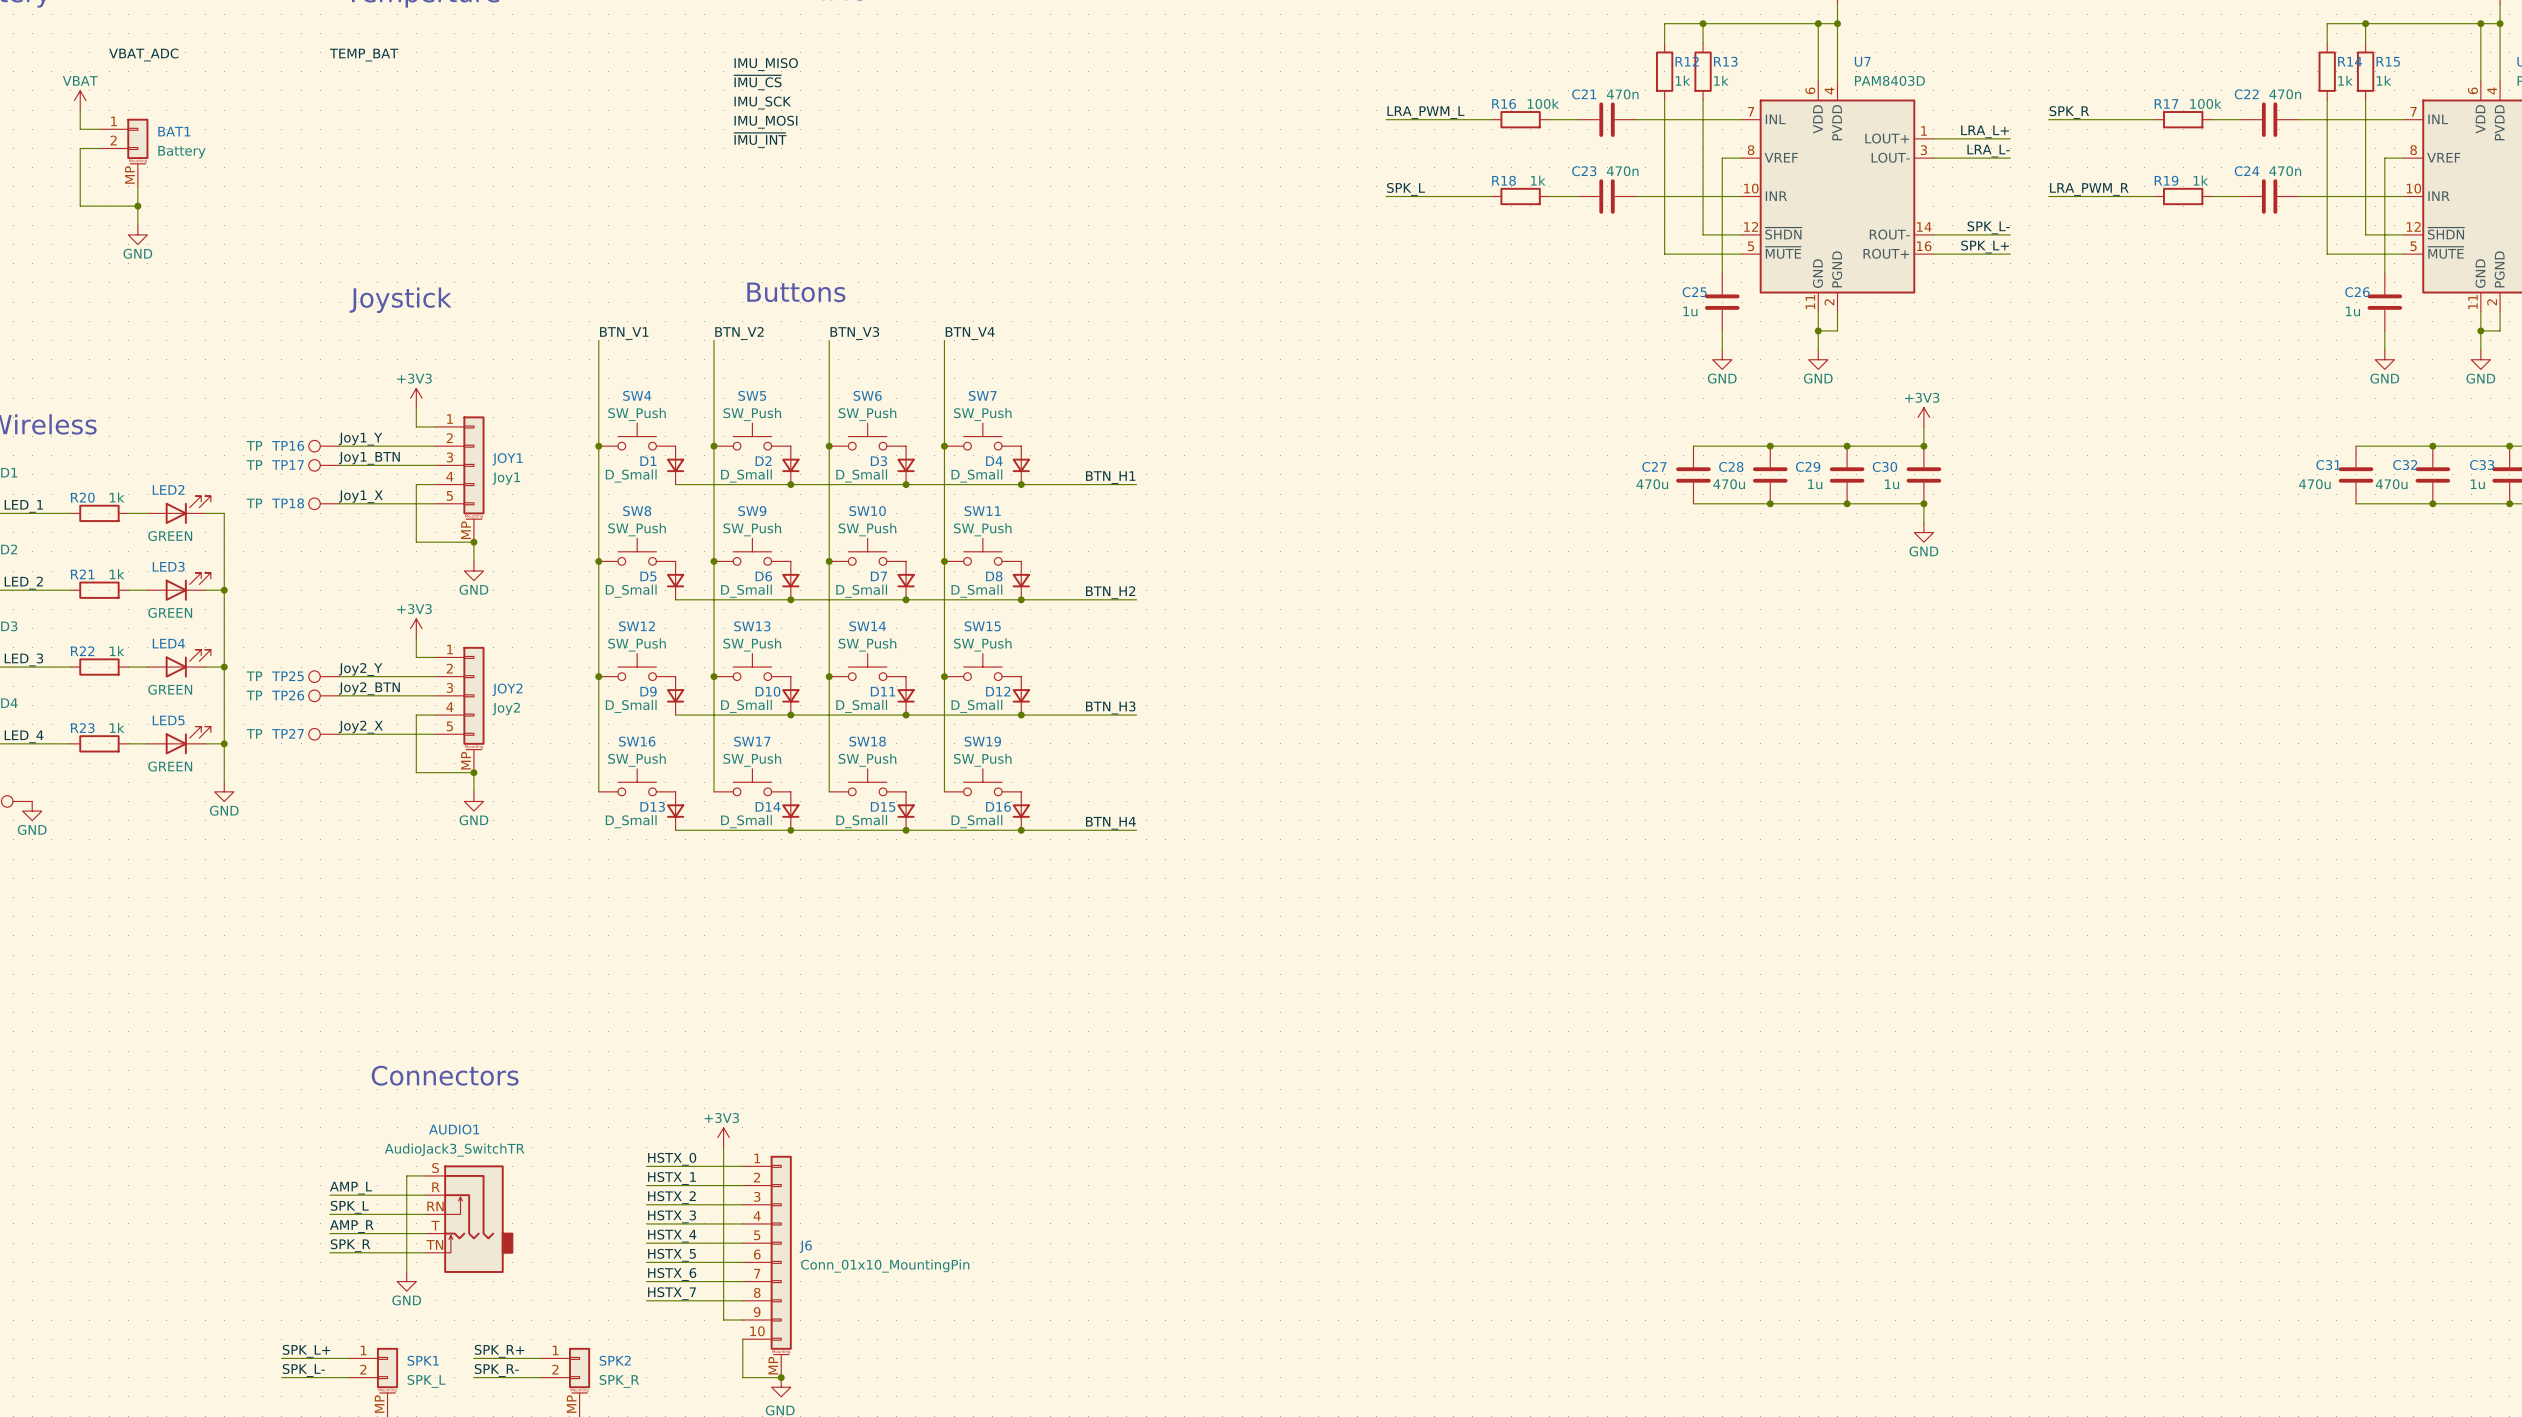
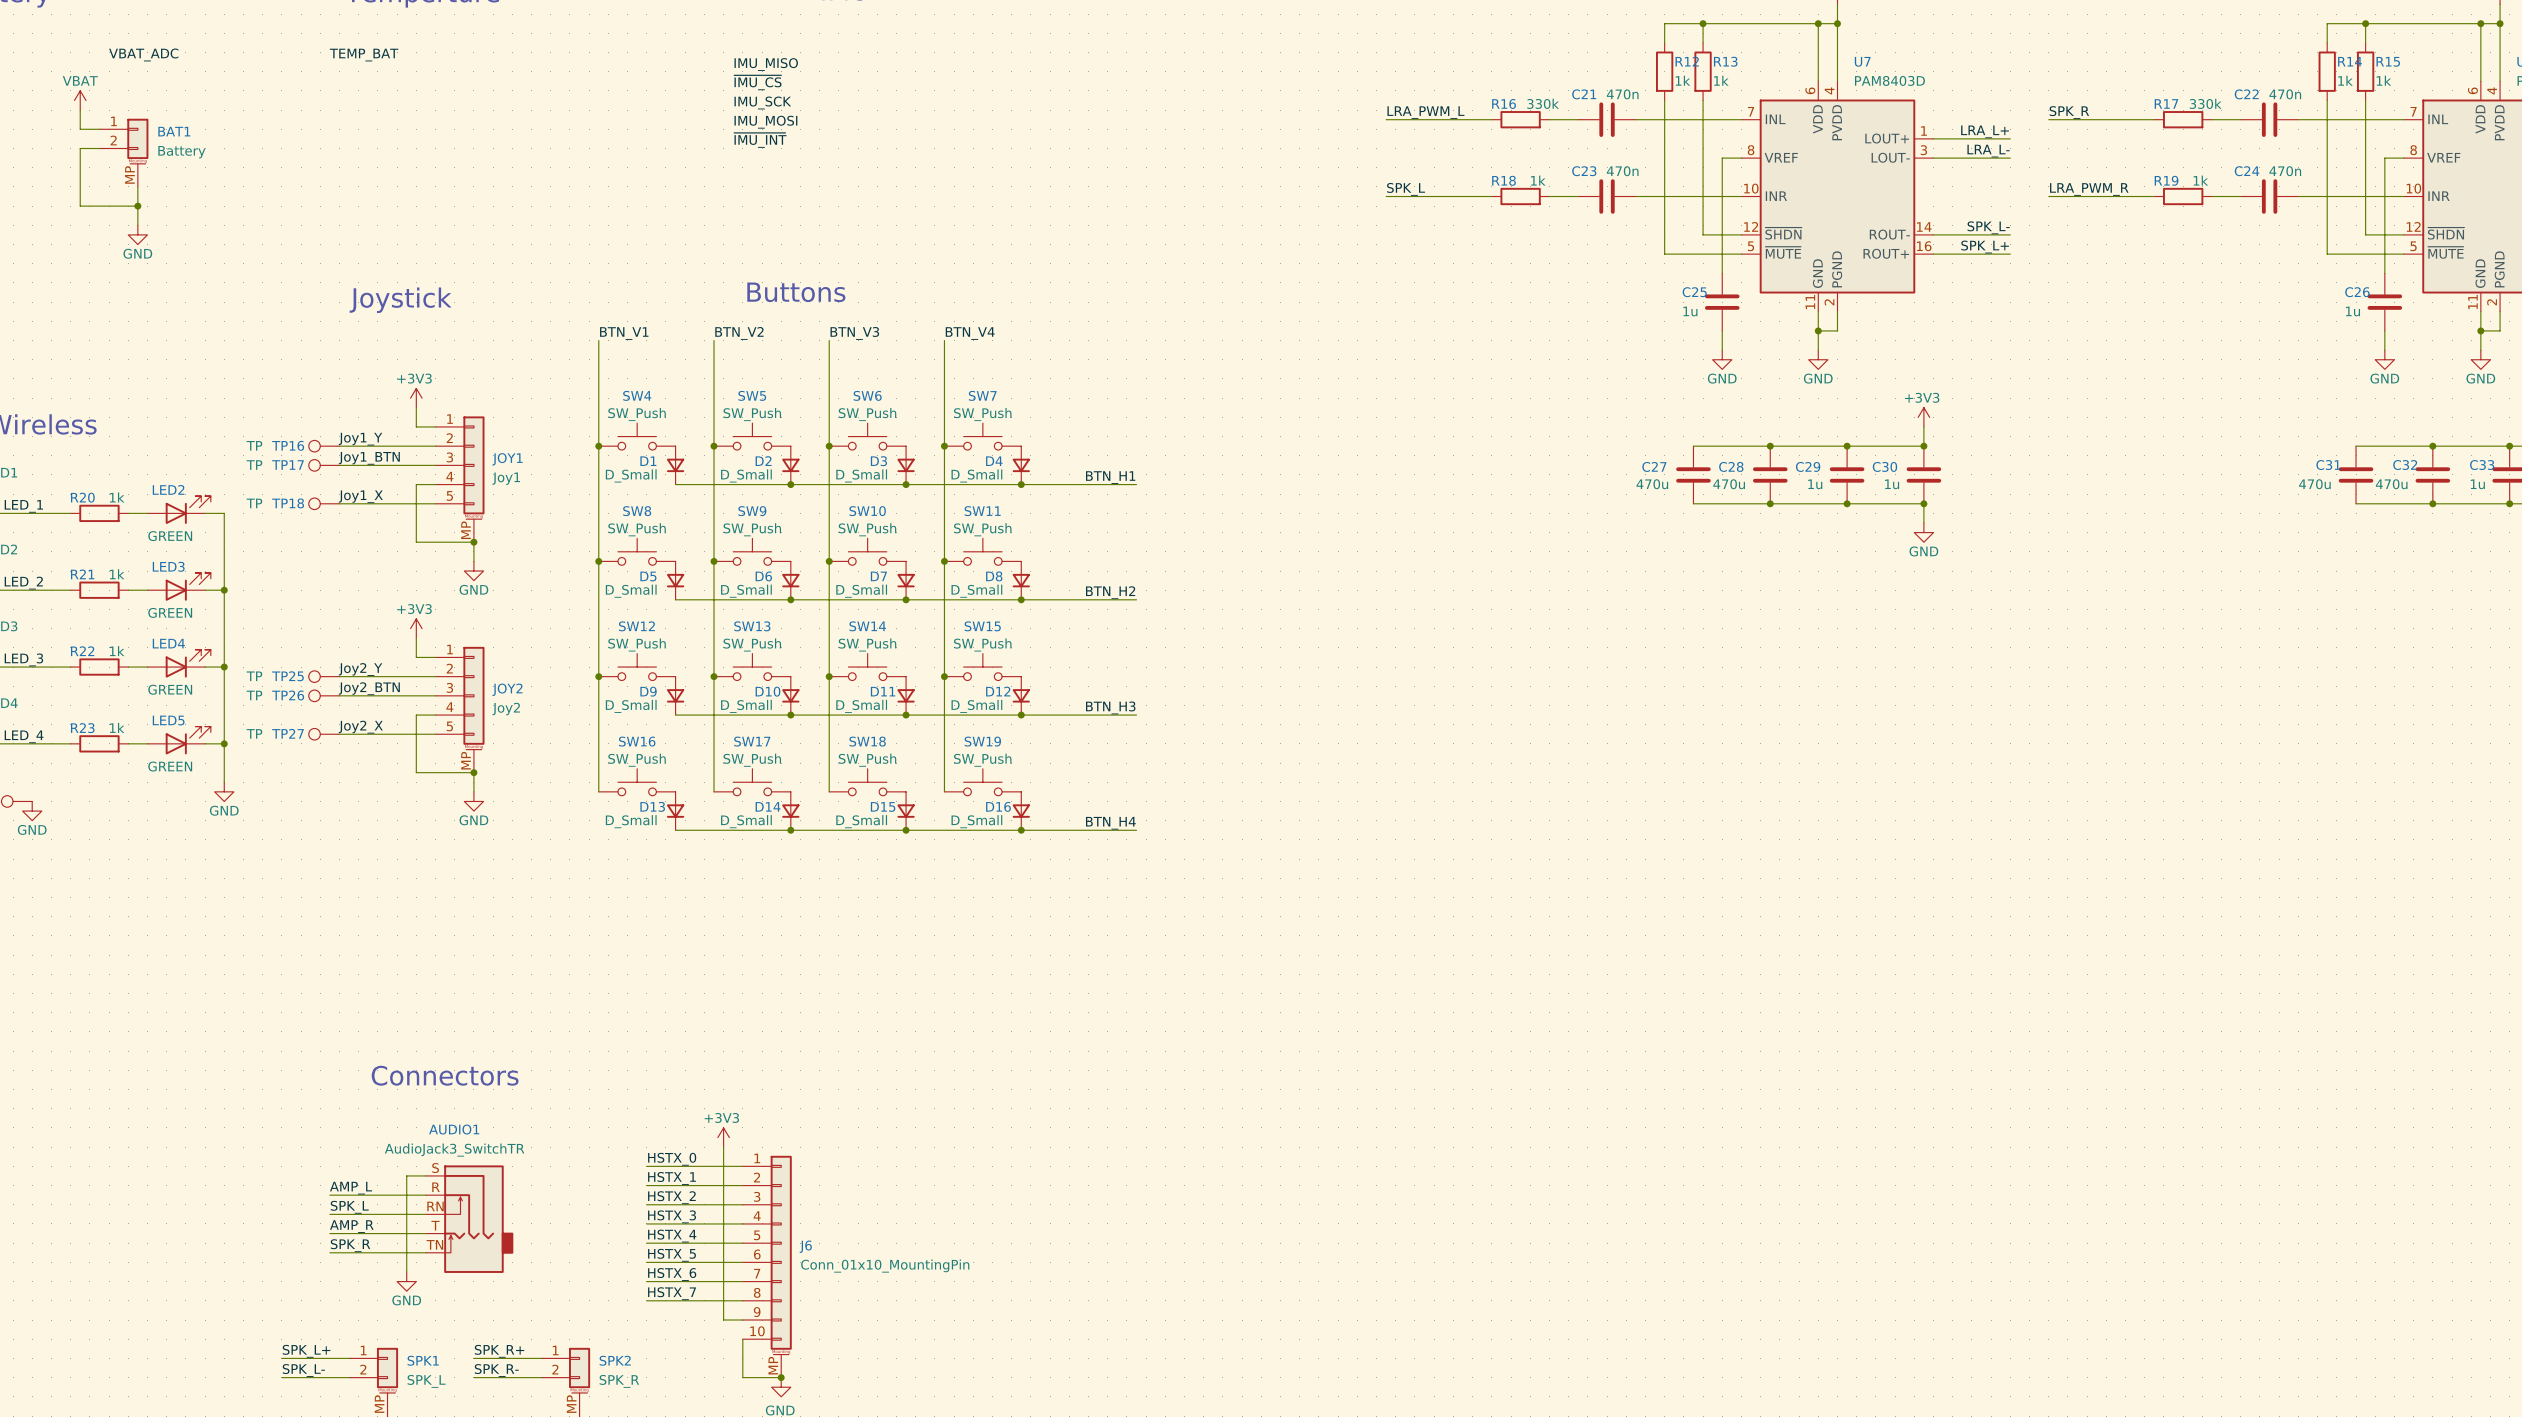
R16 value: 100k (1543, 103) -> 330k (1543, 103)
R17 value: 100k (2205, 103) -> 330k (2205, 103)

